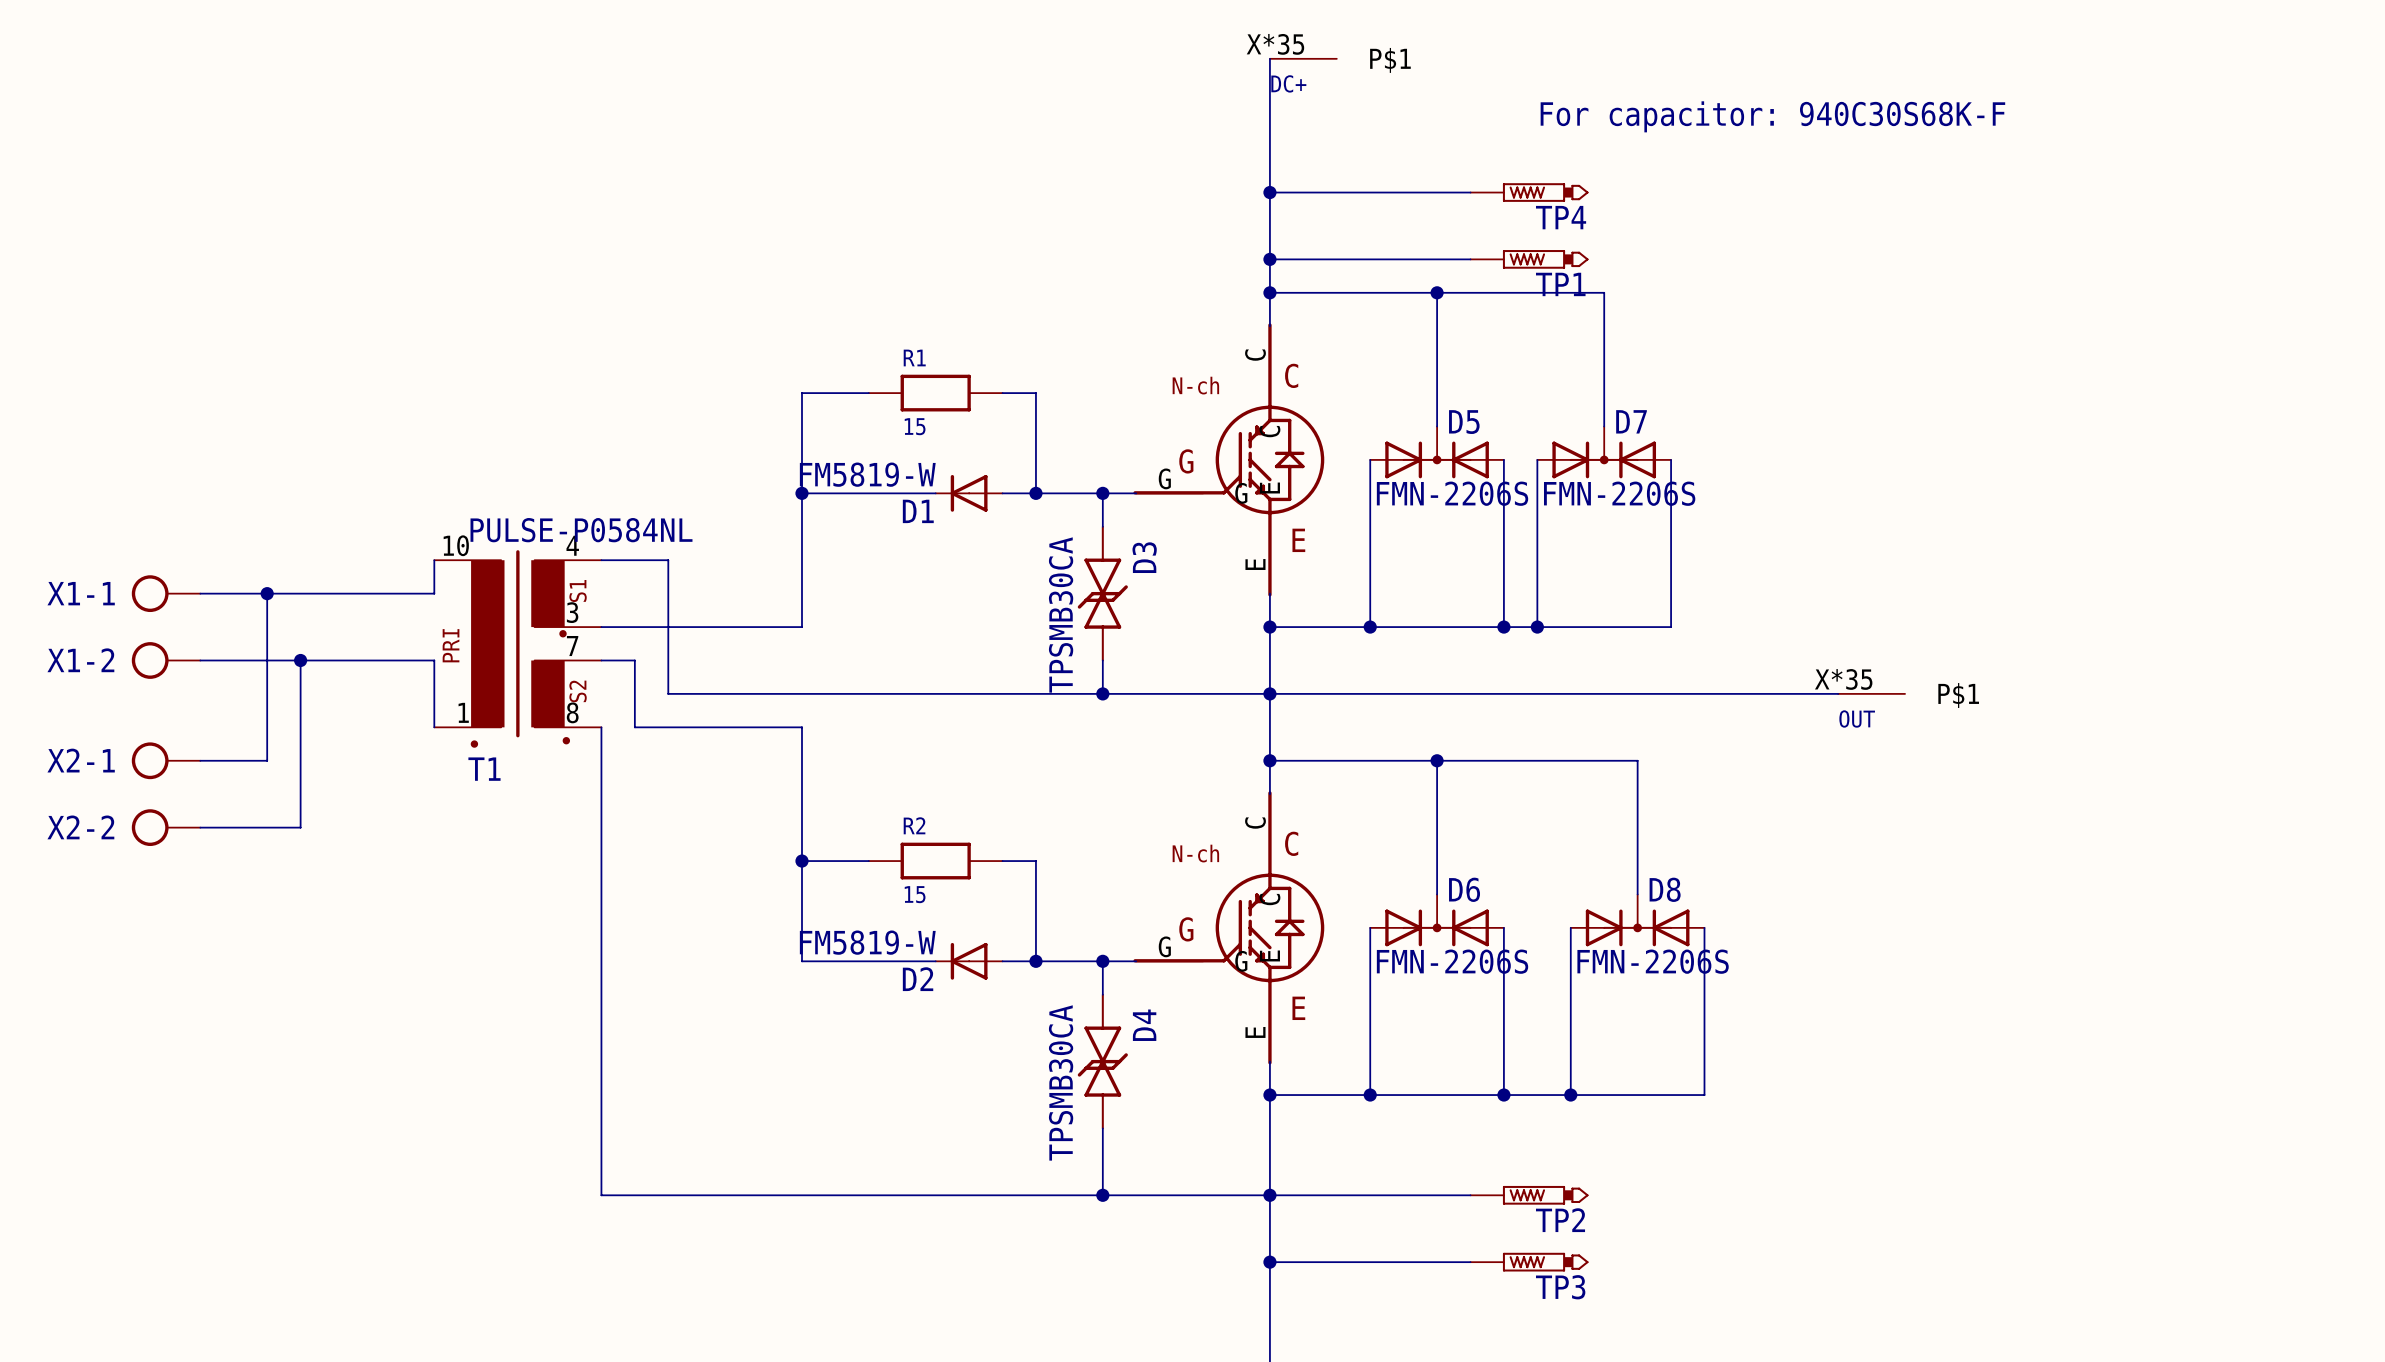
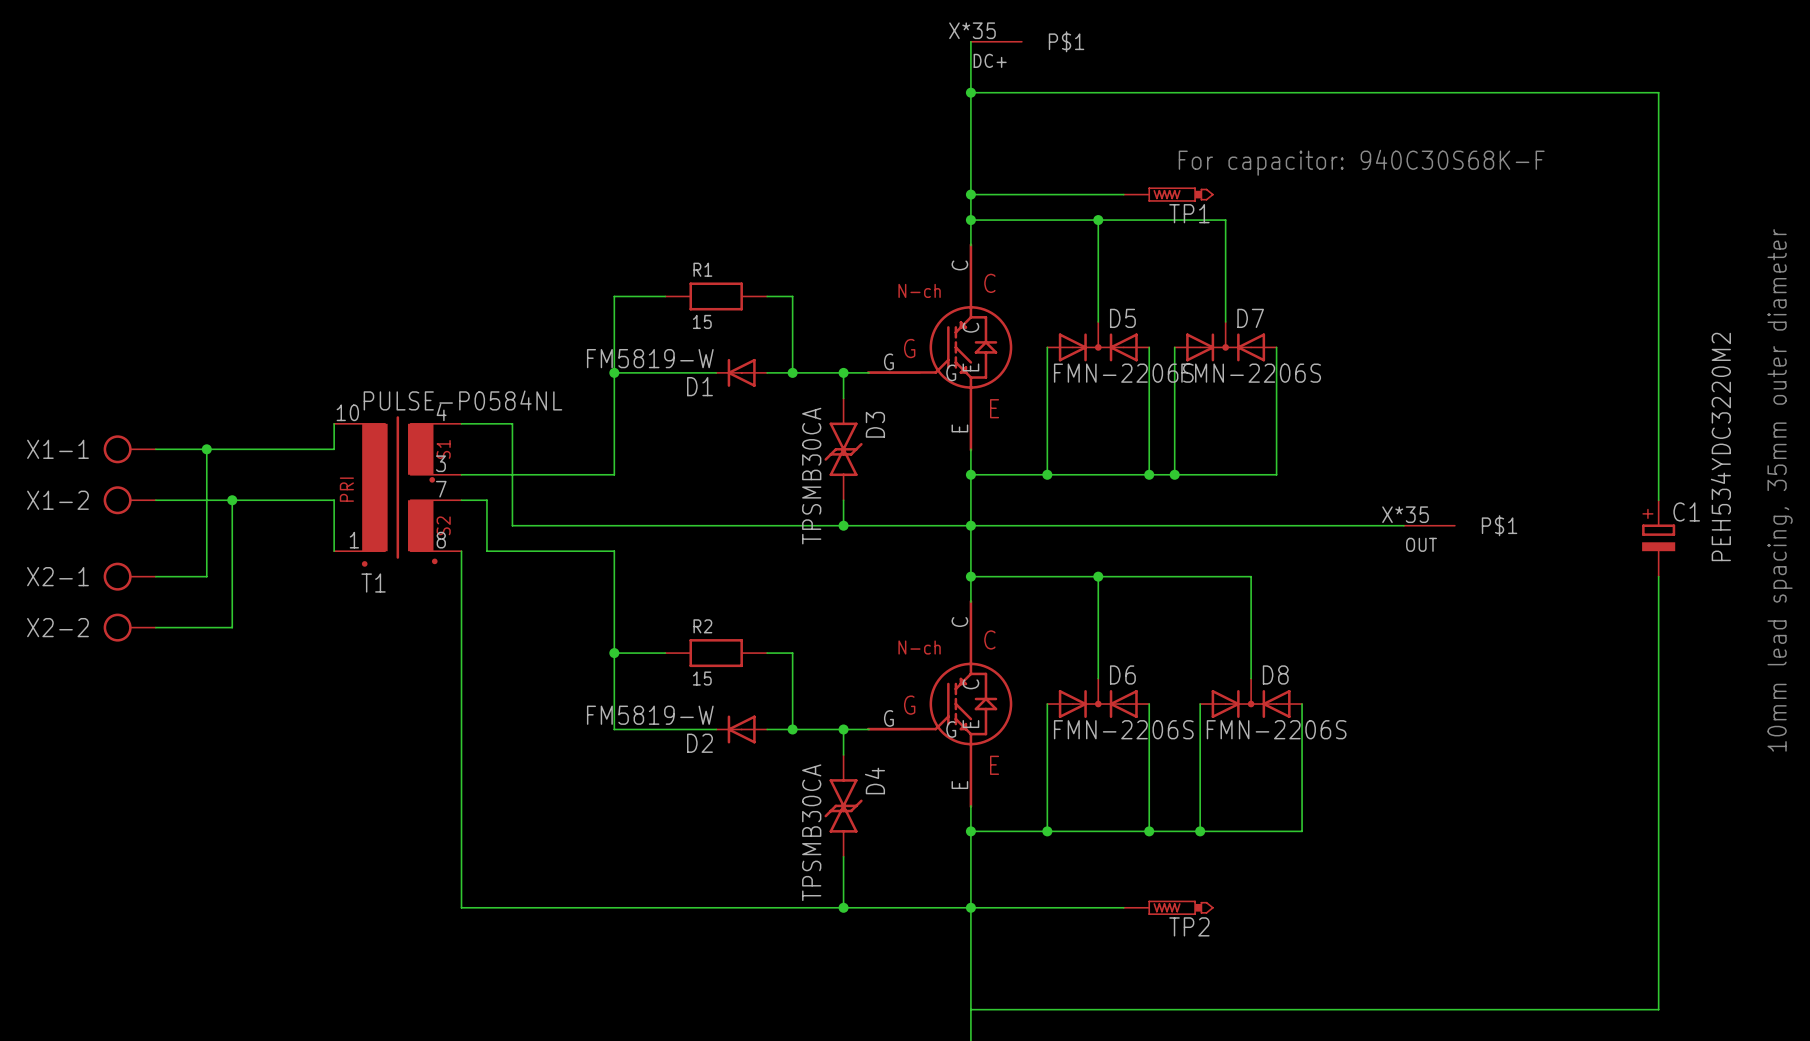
text position: For capacitor: 940C30S68K-F (1772, 116) -> For capacitor: 940C30S68K-F (1361, 162)
wire: none -> (970, 92) (1658, 92) (1658, 500)
wire: (1269, 192) (1470, 192) -> none
junction position: (1269, 192) -> (970, 92)
TP4: (1529, 192) -> none
text: none -> 10mm lead spacing, 35mm outer diameter (1780, 490)
C1: none -> PEH534YDC3220M2 (1658, 538)
wire: none -> (1658, 576) (1658, 1009) (970, 1009)
wire: (1269, 1262) (1470, 1262) -> none
junction: (1269, 1262) -> none
TP3: (1529, 1262) -> none

